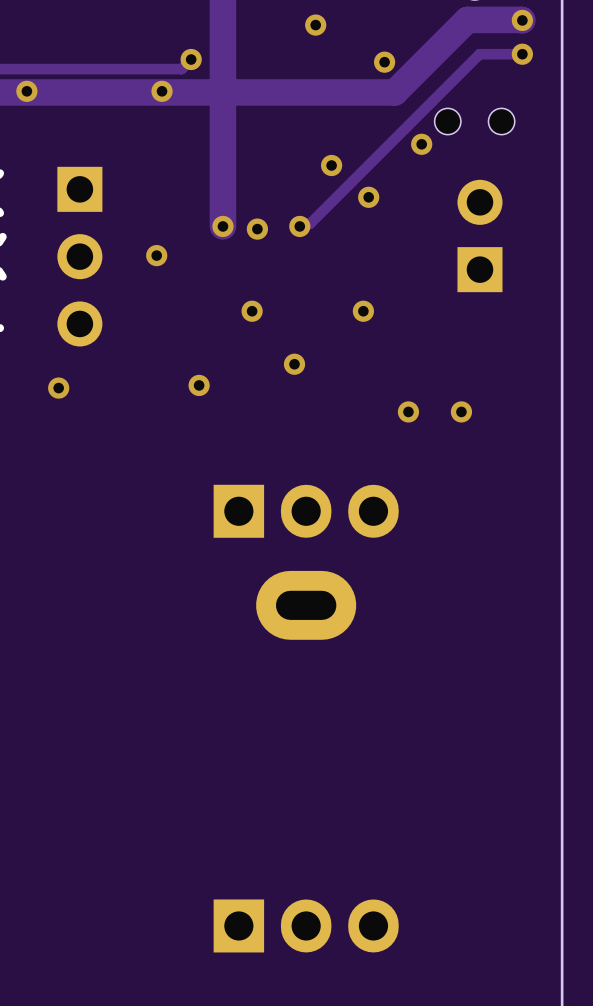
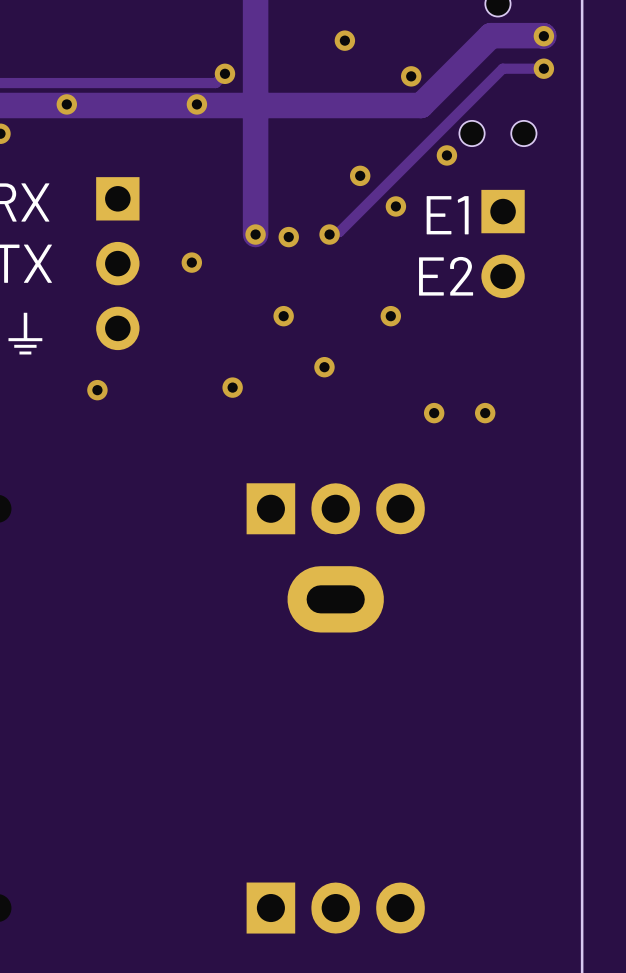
text: none -> E1 (447, 215)
part rotation: 0° (479, 235) -> 180° (503, 243)
text: none -> E2 (446, 276)

